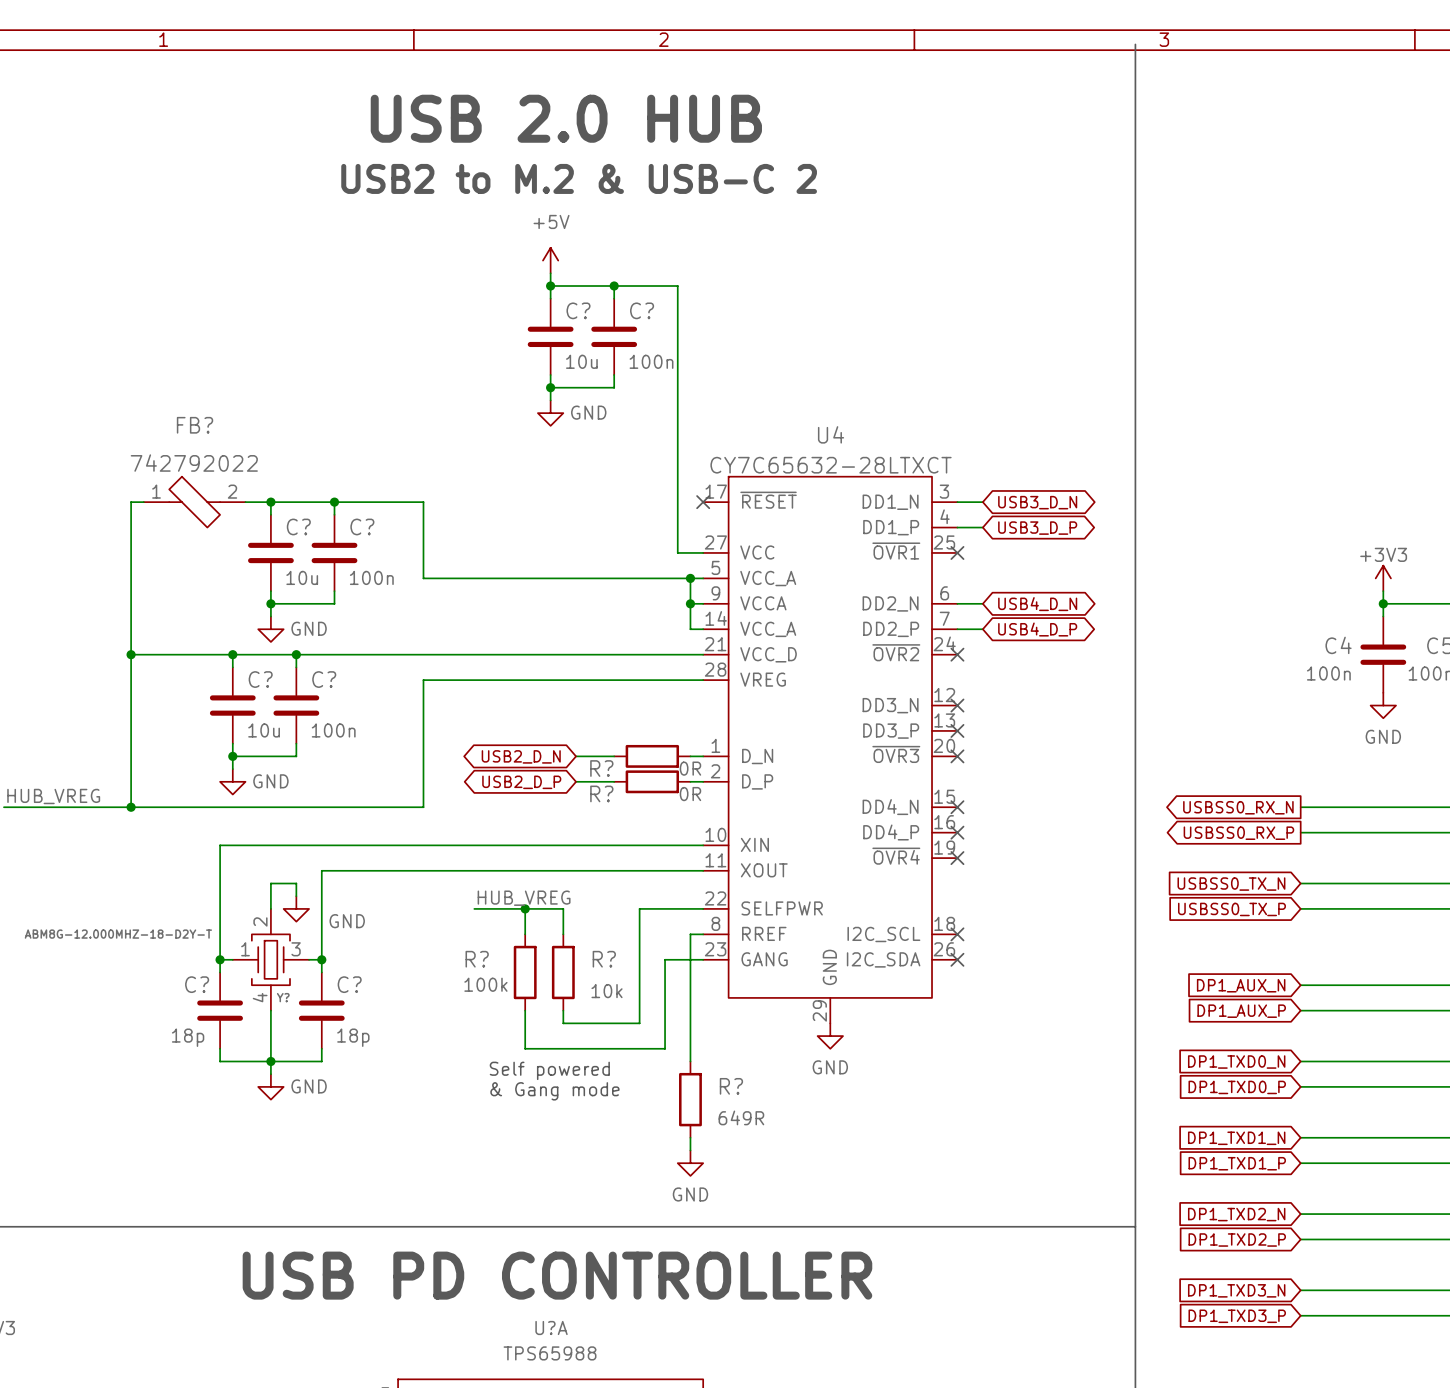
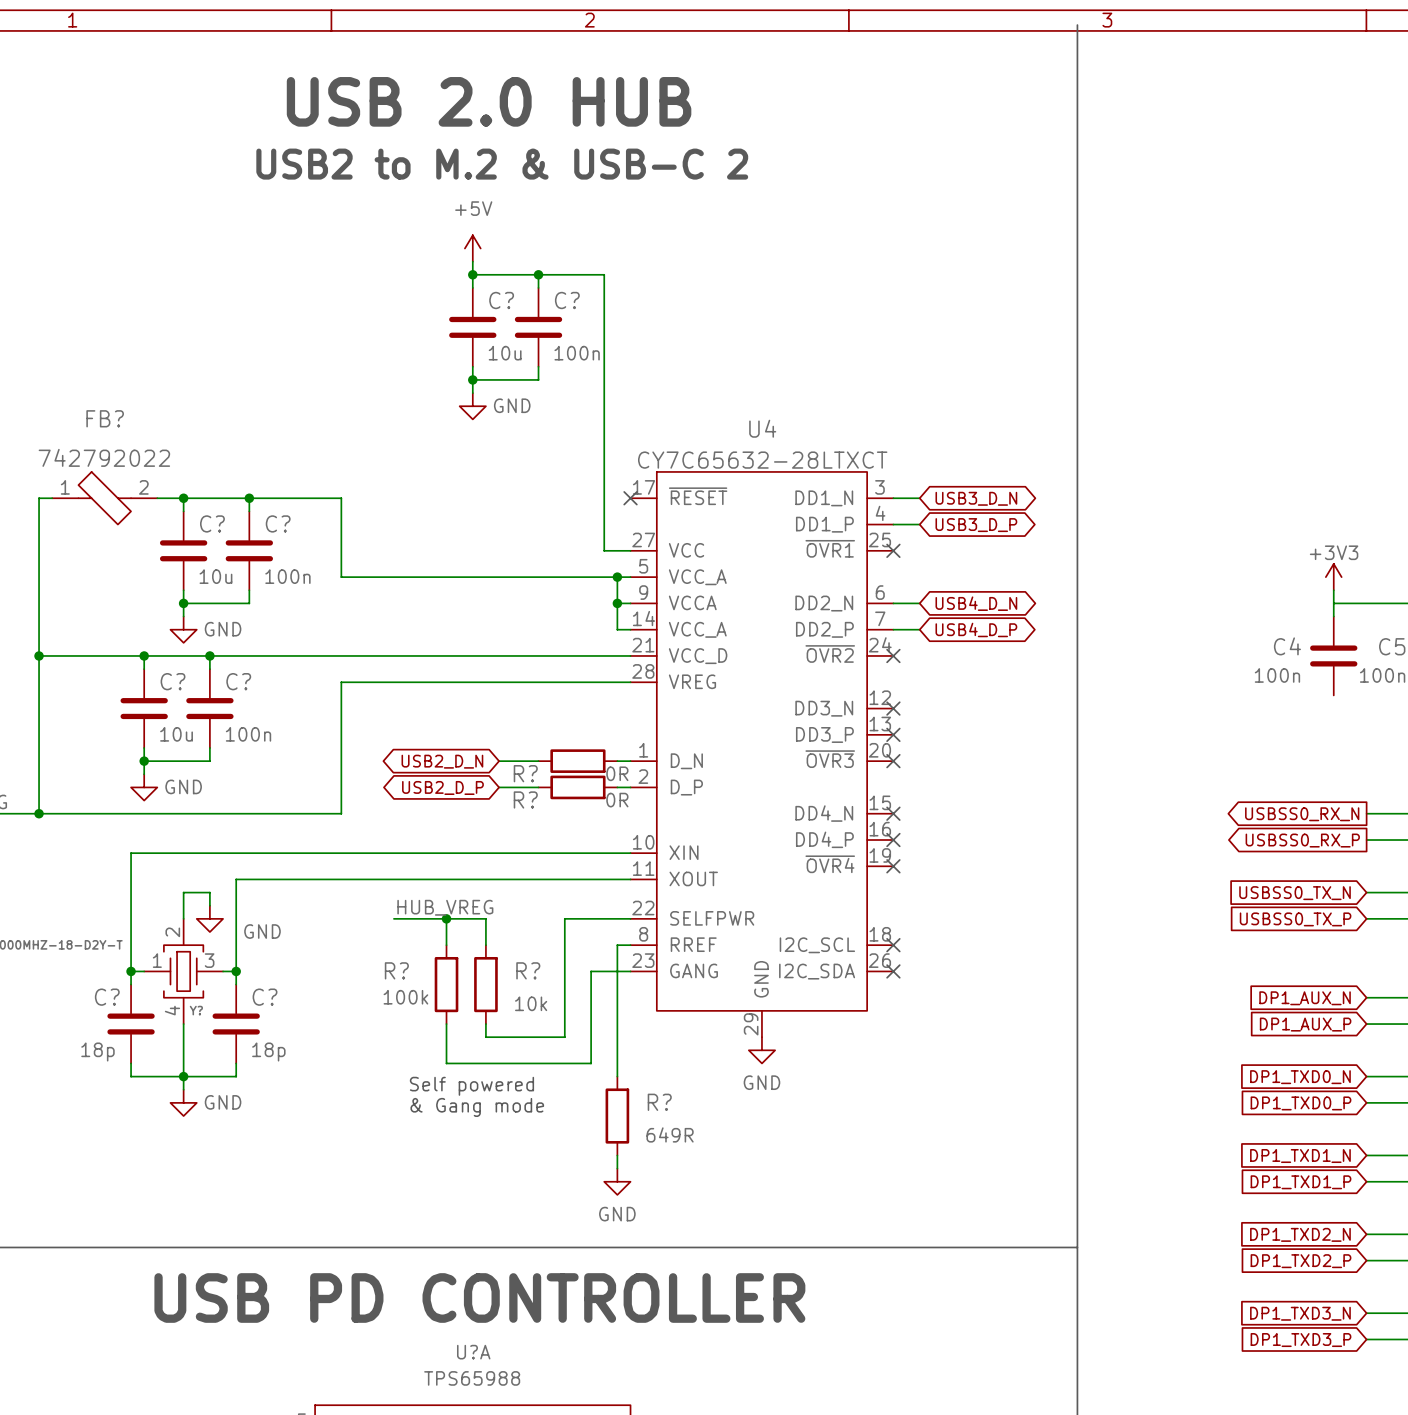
junction: (1383, 603) -> none
power symbol: GND (1383, 705) -> none
global label position: USBSS0_RX_N (1238, 807) -> USBSS0_RX_N (1302, 814)
wire: (1300, 807) (1415, 807) -> none
wire: (1300, 832) (1415, 832) -> none
global label position: USBSS0_RX_P (1238, 833) -> USBSS0_RX_P (1302, 840)
wire: (1300, 883) (1415, 883) -> none
global label position: USBSS0_TX_N (1231, 884) -> USBSS0_TX_N (1295, 893)
wire: (1300, 908) (1415, 908) -> none
global label position: USBSS0_TX_P (1231, 909) -> USBSS0_TX_P (1295, 919)
global label position: DP1_AUX_N (1241, 985) -> DP1_AUX_N (1305, 998)
wire: (1300, 985) (1415, 985) -> none
wire: (1300, 1010) (1415, 1010) -> none
global label position: DP1_AUX_P (1241, 1011) -> DP1_AUX_P (1305, 1024)
wire: (1300, 1061) (1415, 1061) -> none
global label position: DP1_TXD0_N (1236, 1062) -> DP1_TXD0_N (1300, 1077)
wire: (1300, 1086) (1415, 1086) -> none
global label position: DP1_TXD0_P (1237, 1087) -> DP1_TXD0_P (1300, 1103)
wire: (1300, 1137) (1415, 1137) -> none
global label position: DP1_TXD1_N (1236, 1138) -> DP1_TXD1_N (1300, 1156)
global label position: DP1_TXD1_P (1237, 1163) -> DP1_TXD1_P (1300, 1182)
wire: (1300, 1163) (1415, 1163) -> none
global label position: DP1_TXD2_N (1236, 1214) -> DP1_TXD2_N (1300, 1234)
wire: (1300, 1214) (1415, 1214) -> none
wire: (1300, 1239) (1415, 1239) -> none
global label position: DP1_TXD2_P (1237, 1240) -> DP1_TXD2_P (1300, 1261)
global label position: DP1_TXD3_N (1236, 1290) -> DP1_TXD3_N (1300, 1313)
wire: (1300, 1290) (1415, 1290) -> none
wire: (1300, 1315) (1415, 1315) -> none
global label position: DP1_TXD3_P (1237, 1316) -> DP1_TXD3_P (1300, 1340)

